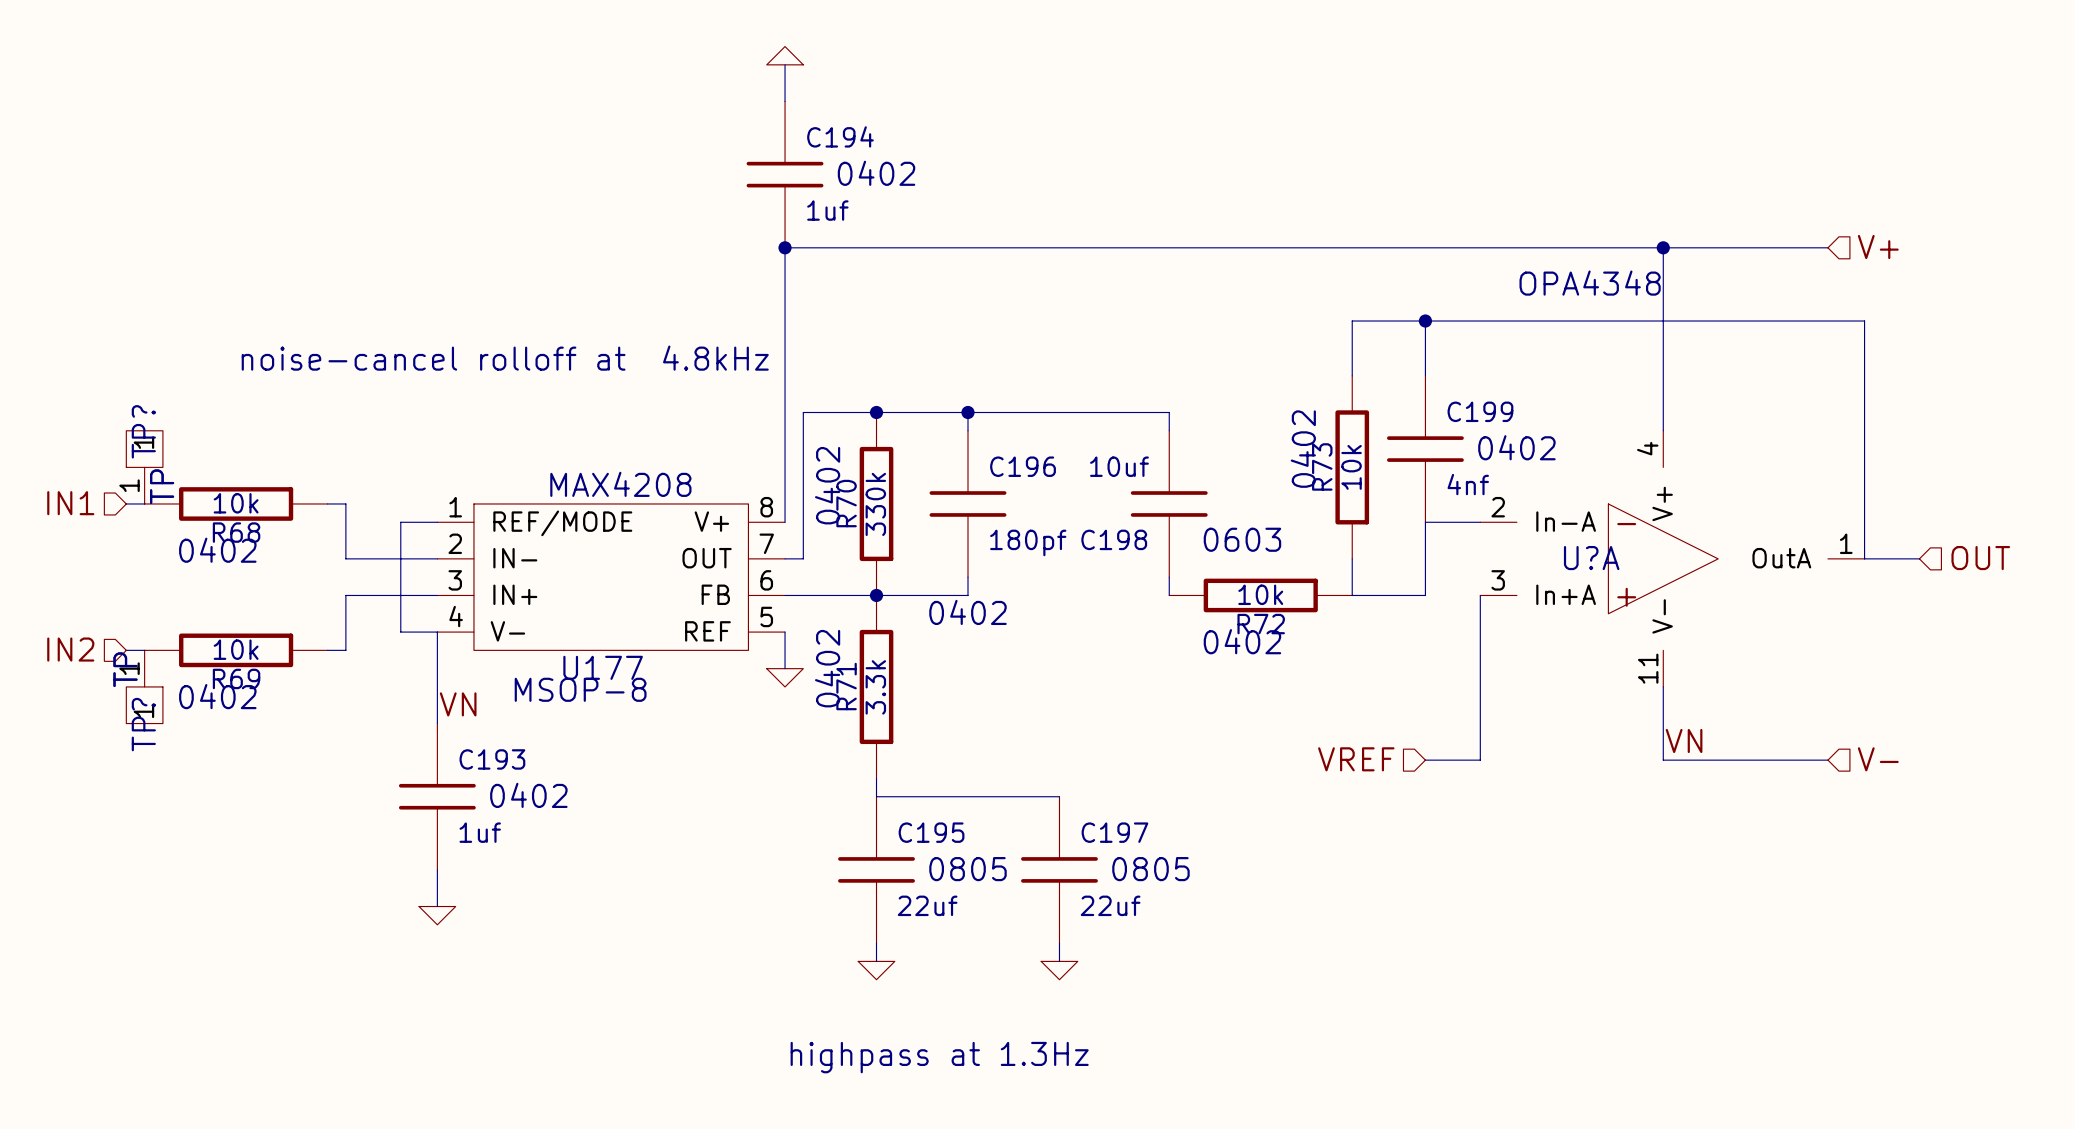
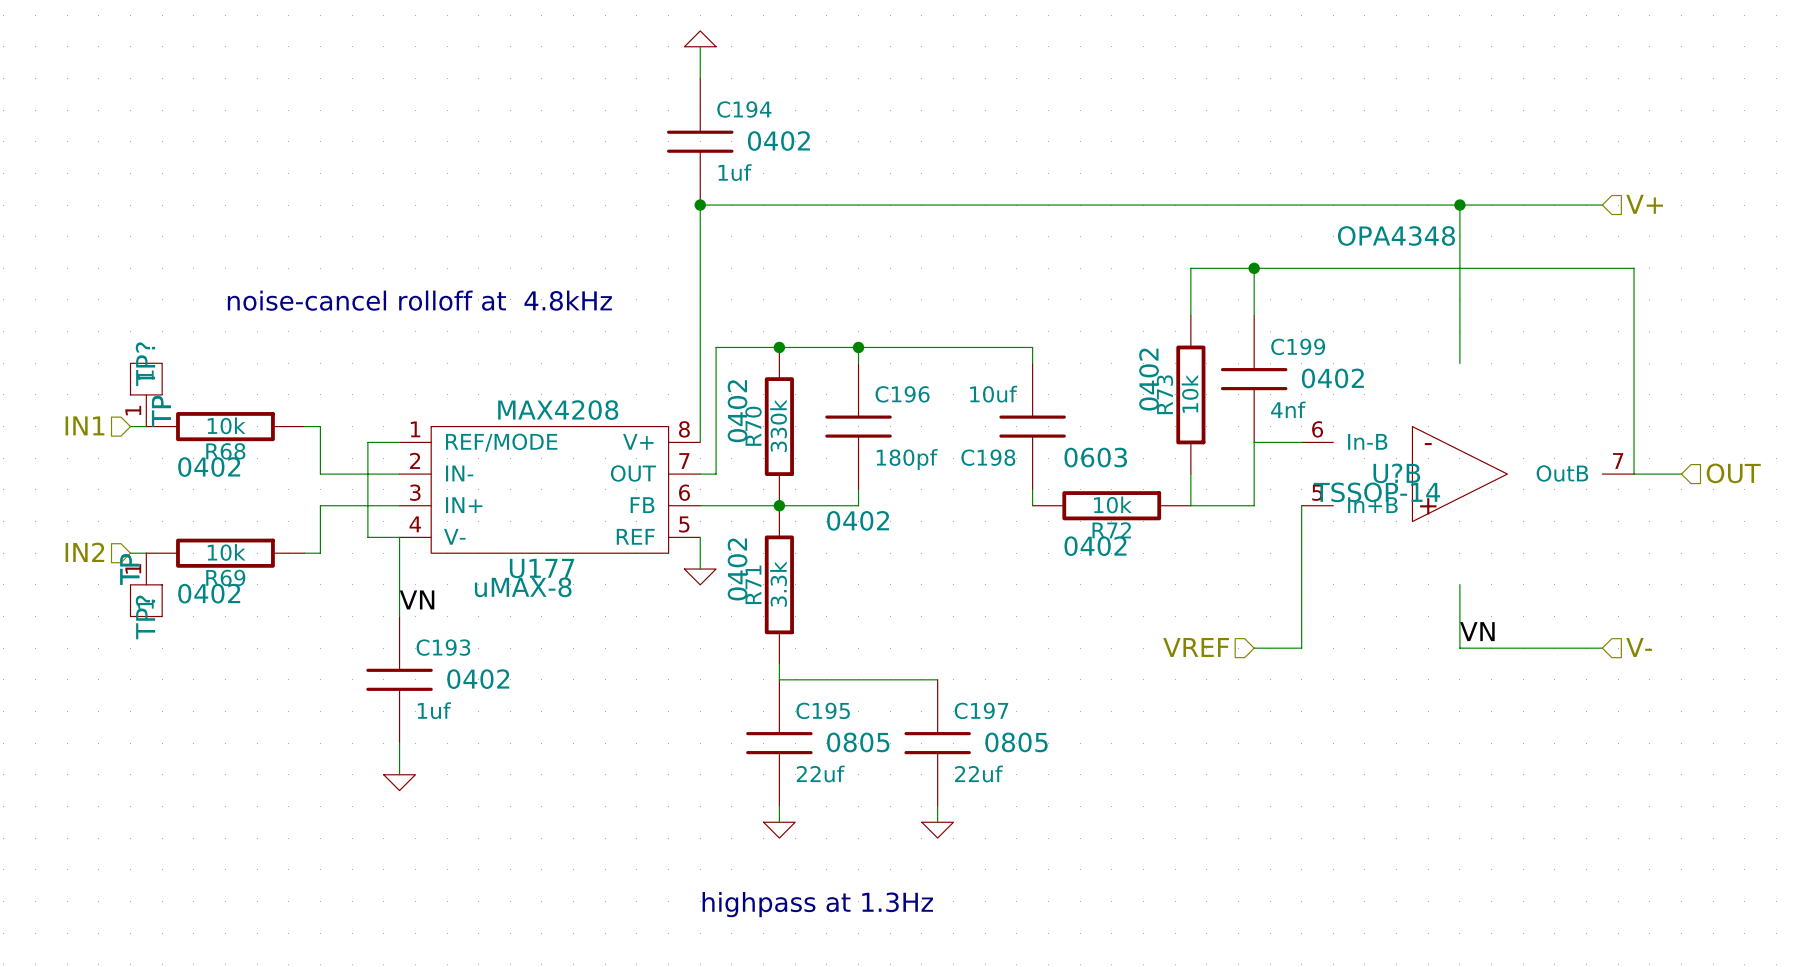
U?A: OPA4348 (1672, 558) -> none
U?B: none -> OPA4348 (1467, 474)
U177 text: MSOP-8 (580, 689) -> uMAX-8 (523, 587)

